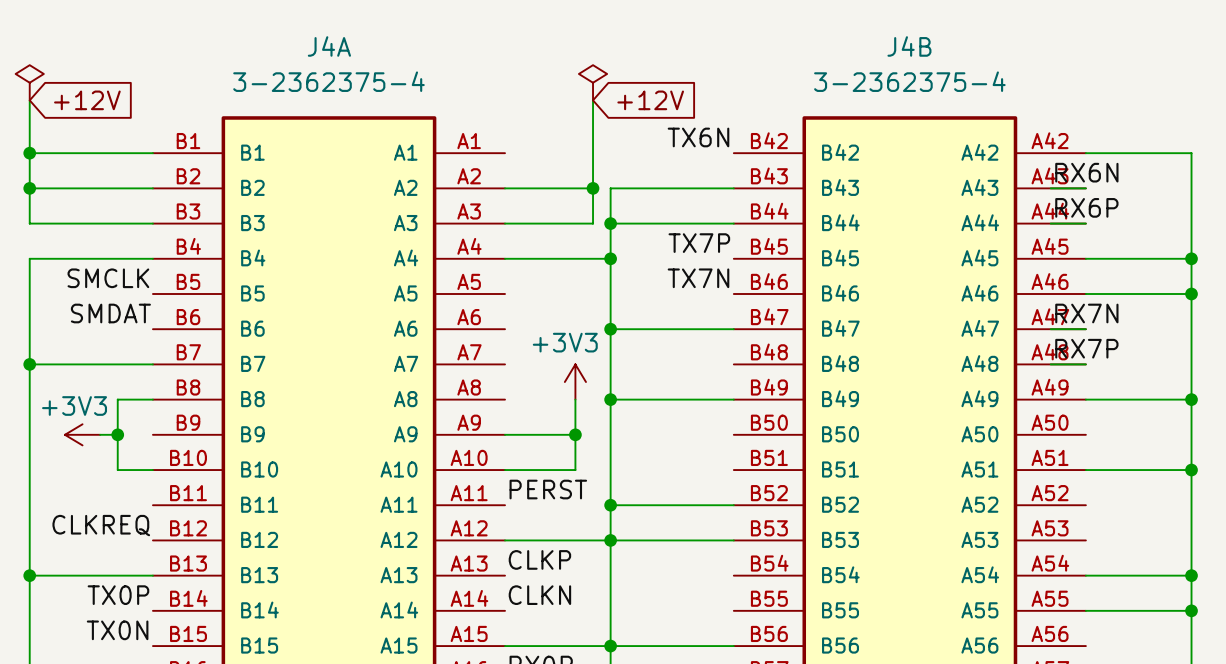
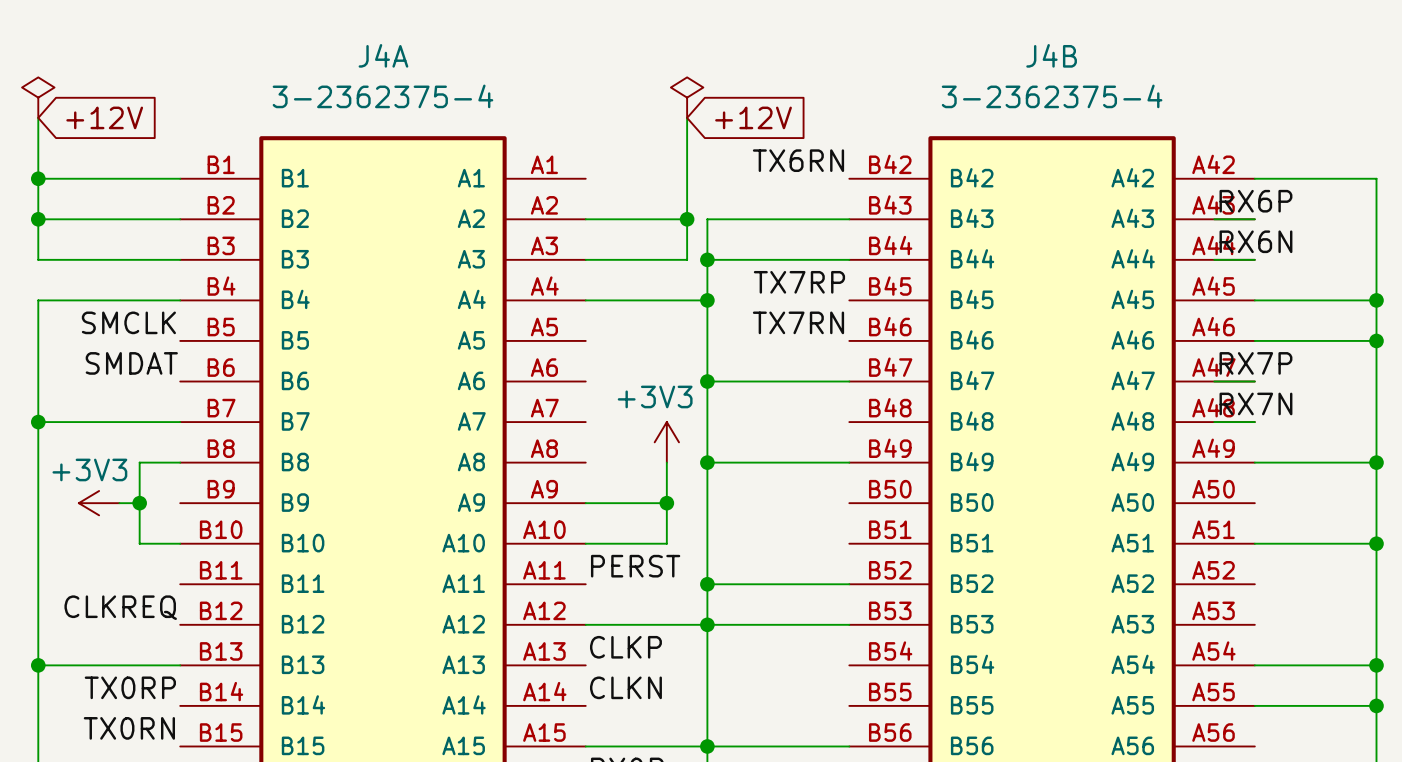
label: TX6N (698, 137) -> TX6RN (798, 160)
label: RX6N (1086, 172) -> RX6P (1255, 201)
label: RX6P (1086, 207) -> RX6N (1255, 241)
label: TX7P (699, 243) -> TX7RP (799, 282)
label: TX7N (698, 278) -> TX7RN (798, 322)
label: RX7N (1086, 313) -> RX7P (1255, 363)
label: RX7P (1086, 348) -> RX7N (1255, 403)
label: TX0P (118, 595) -> TX0RP (130, 687)
label: TX0N (117, 630) -> TX0RN (129, 728)

